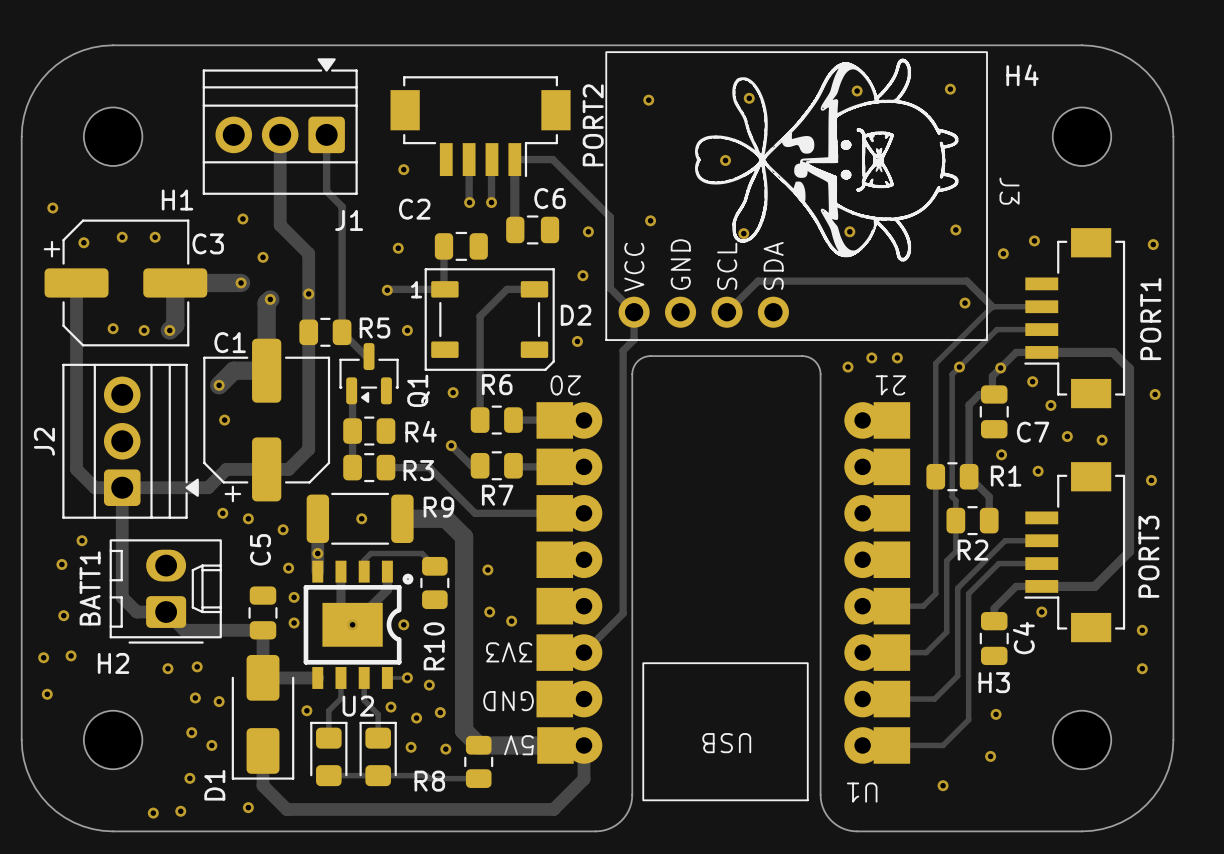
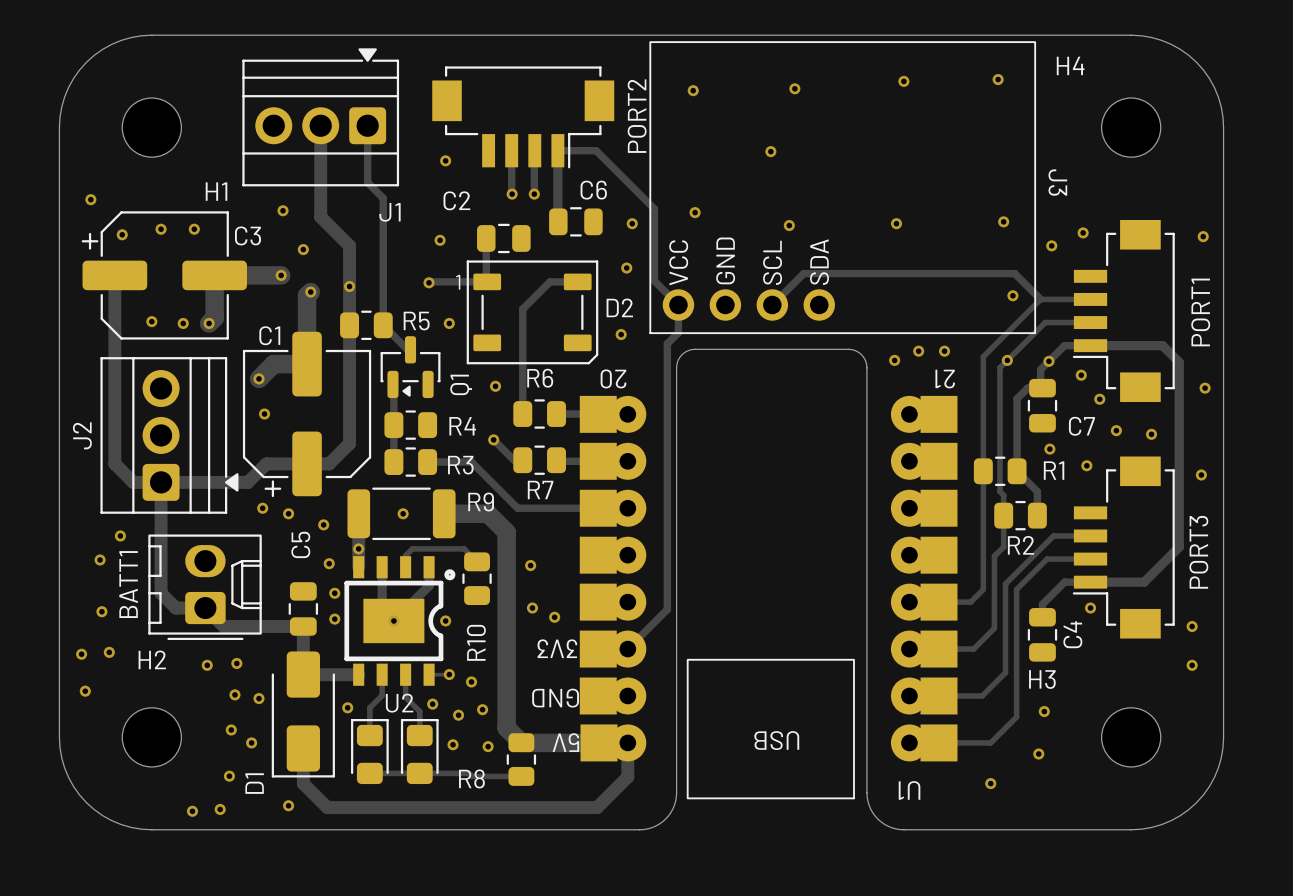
drawing: [695, 58, 959, 262] -> none

